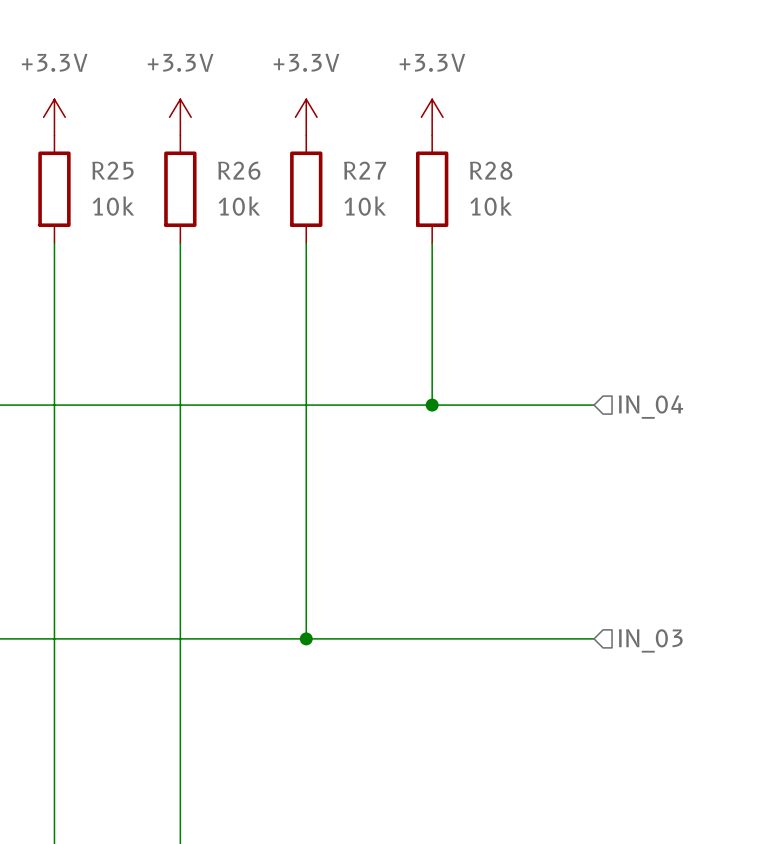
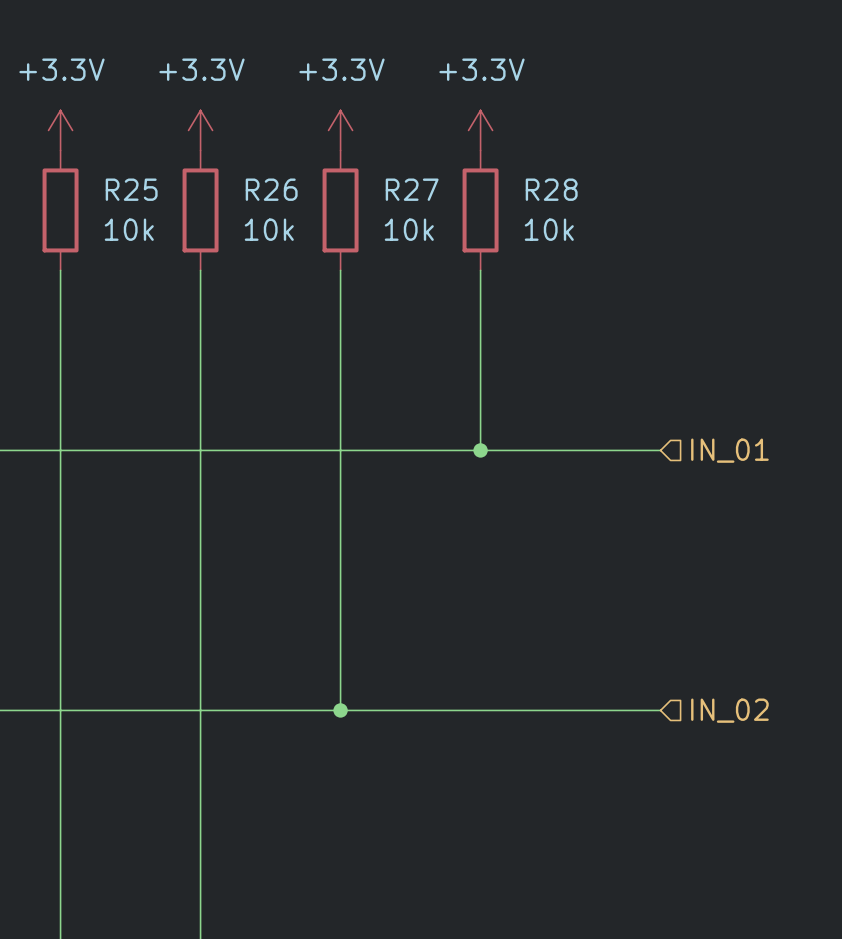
hierarchical label: IN_04 (650, 407) -> IN_01 (729, 450)
hierarchical label: IN_03 (650, 640) -> IN_02 (729, 710)

